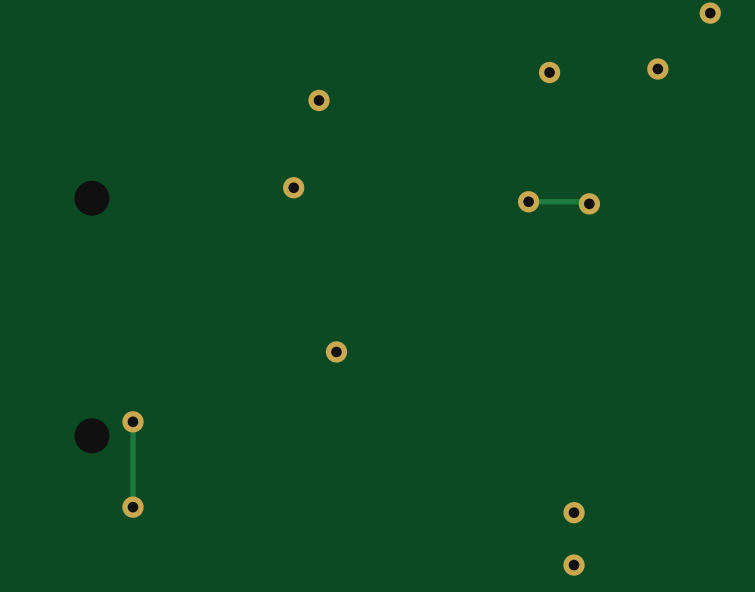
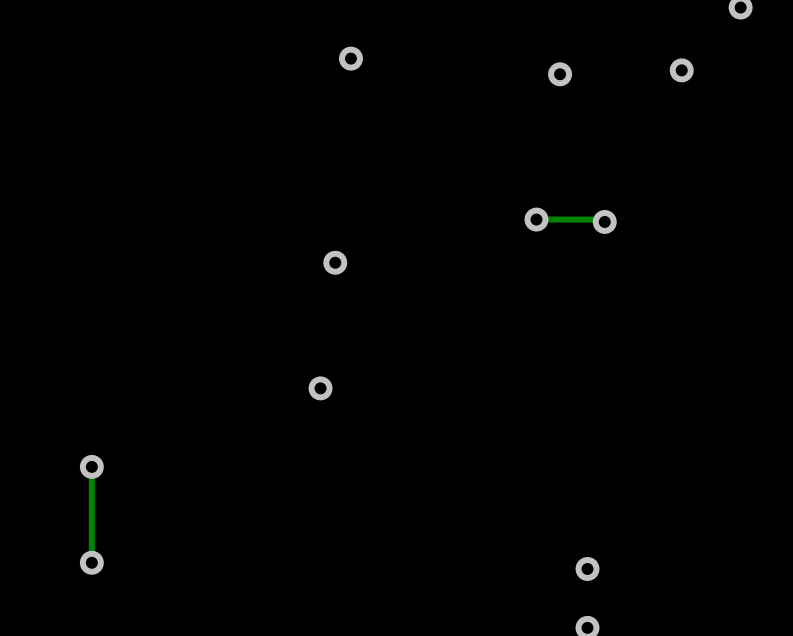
via position: (319, 100) -> (350, 58)
via: (293, 187) -> none
via: none -> (335, 262)

